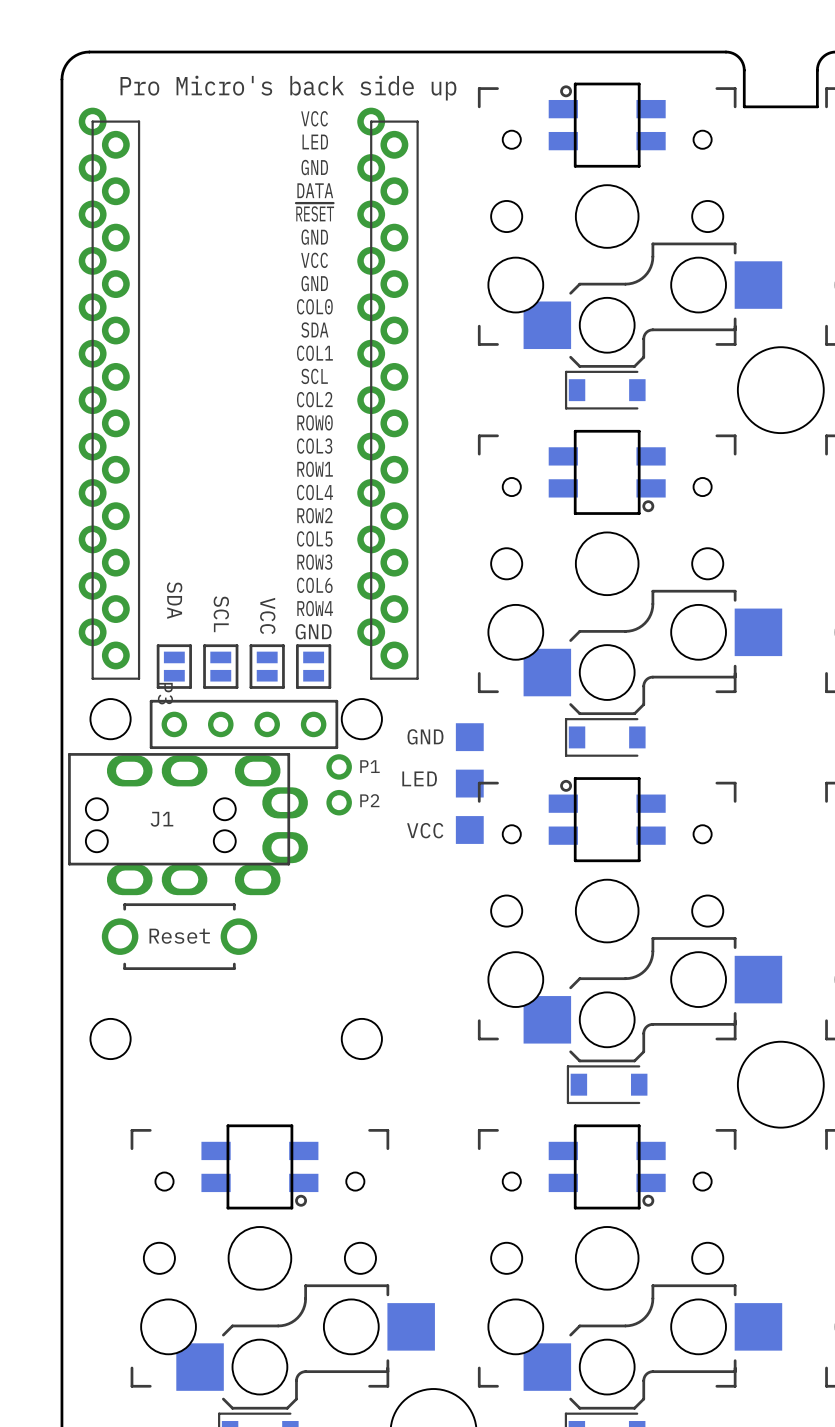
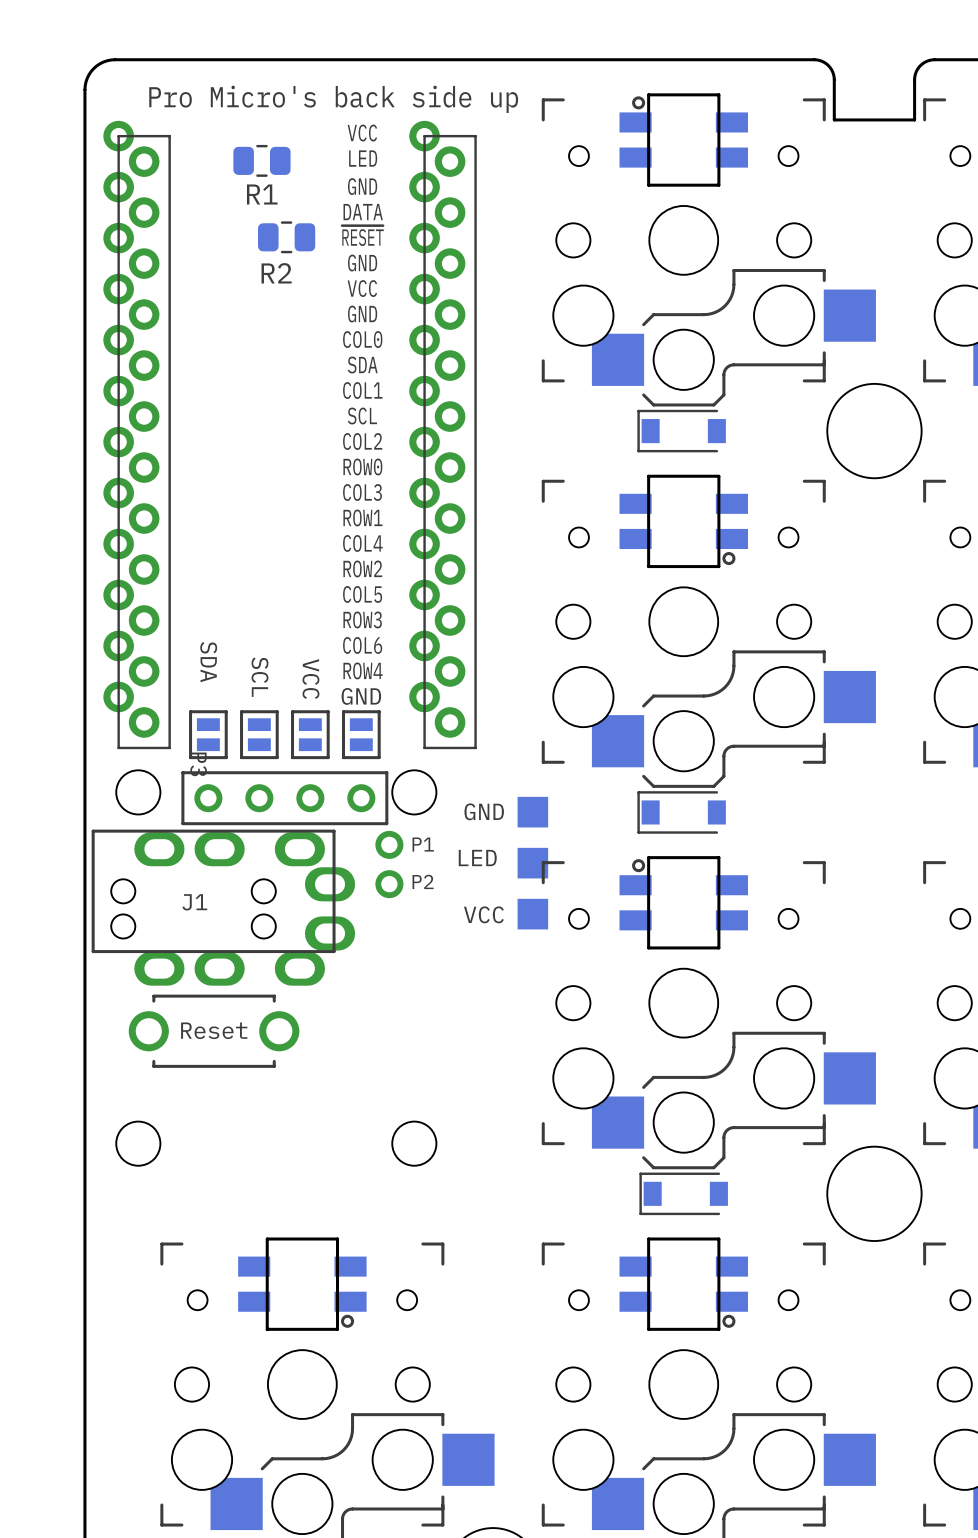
R1: none -> (261, 160)
R2: none -> (286, 237)

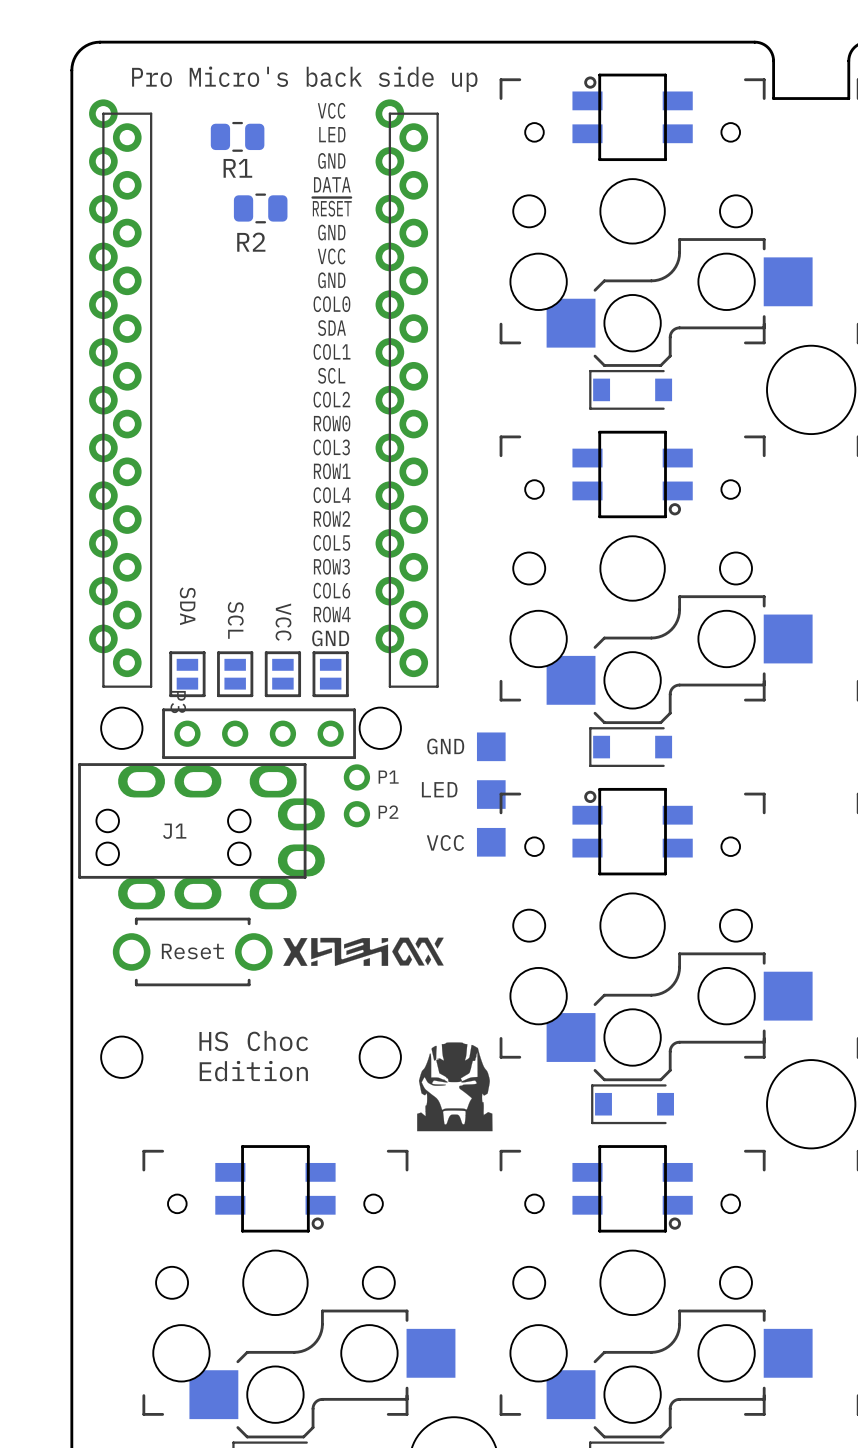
drawing: none -> [283, 937, 444, 967]
text: none -> HS Choc (253, 1041)
drawing: none -> [417, 1042, 493, 1132]
text: none -> Edition (253, 1071)

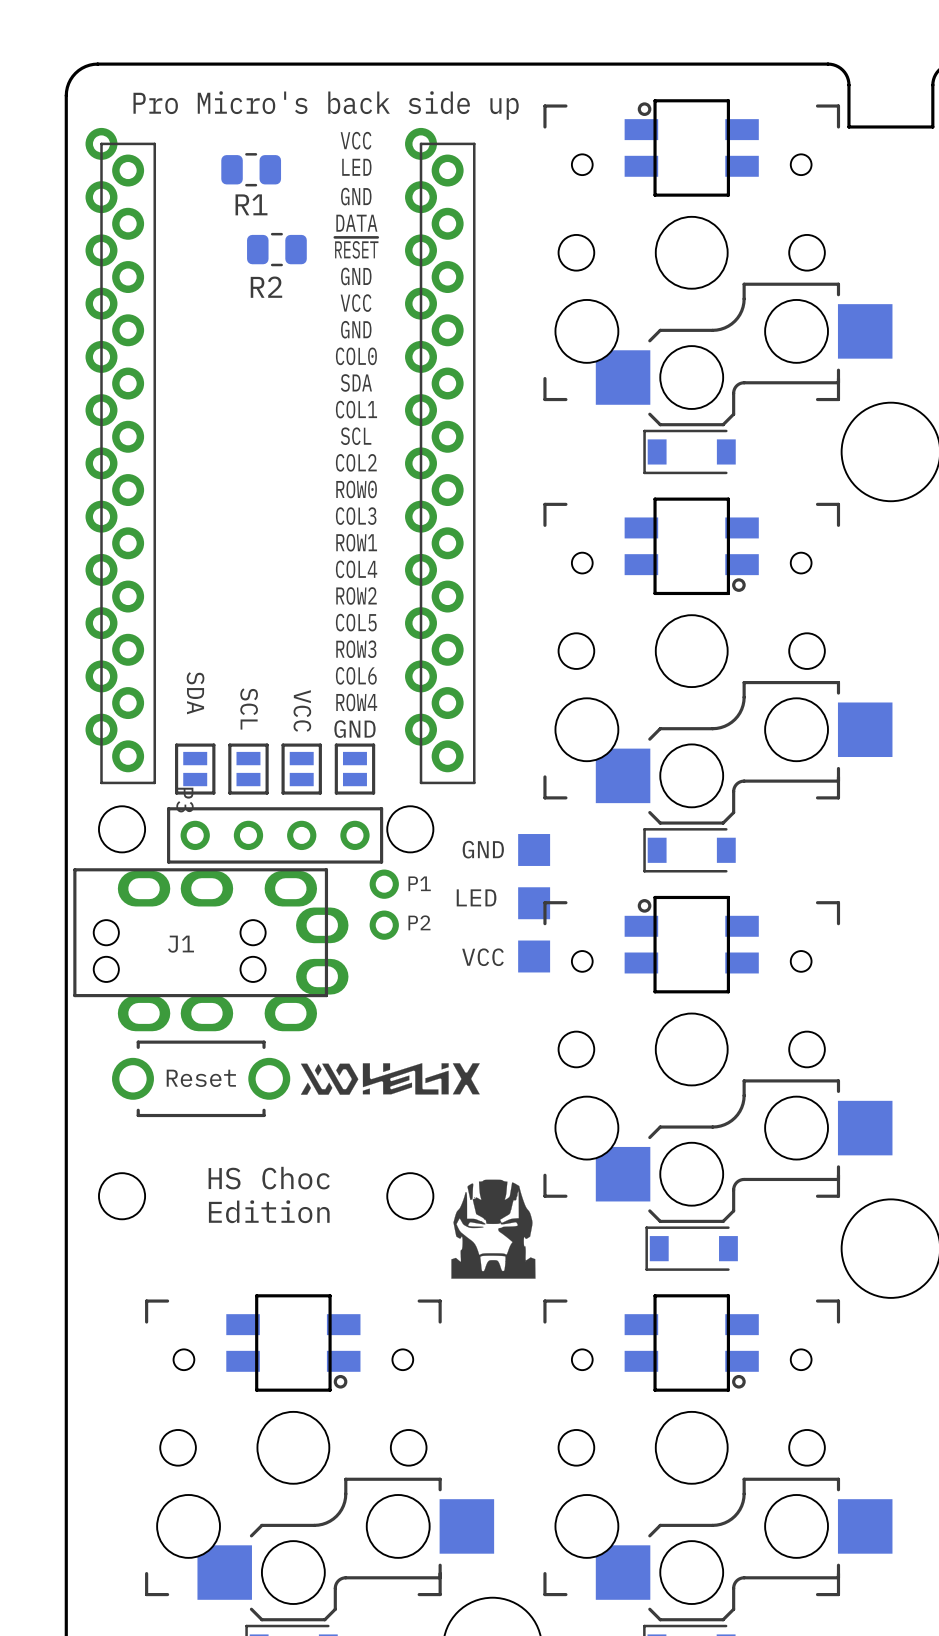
drawing shape: [283, 937, 444, 967] -> [300, 1063, 480, 1095]

